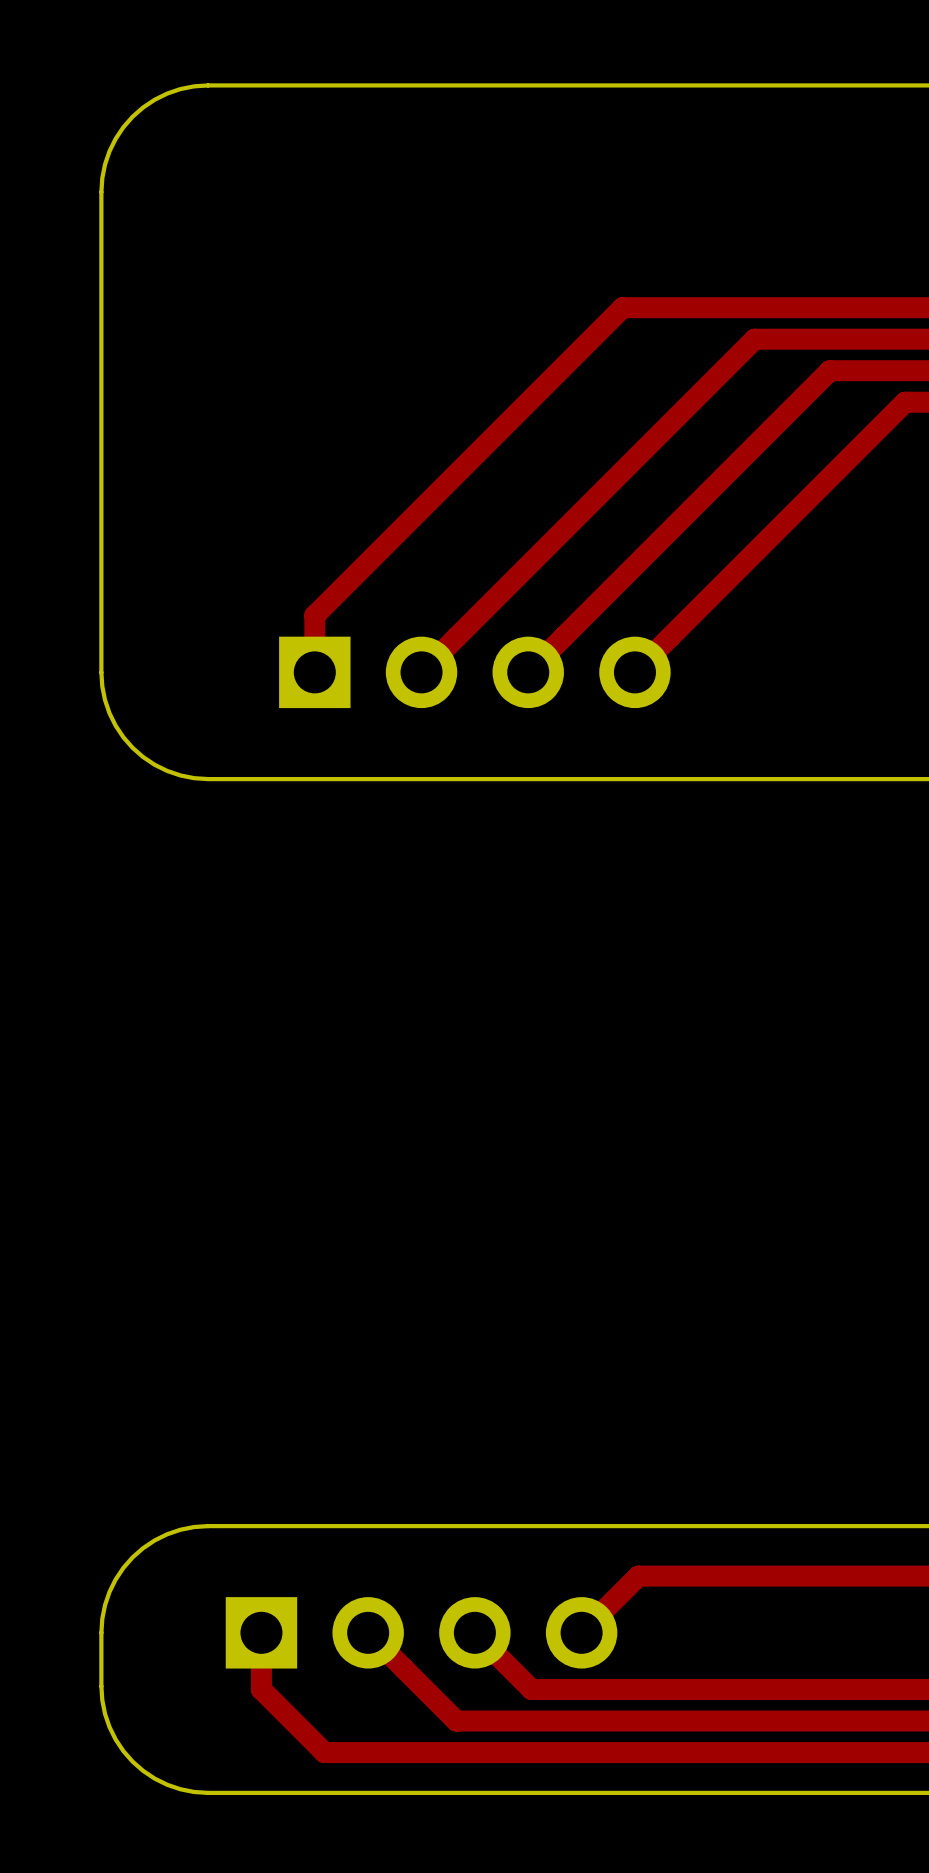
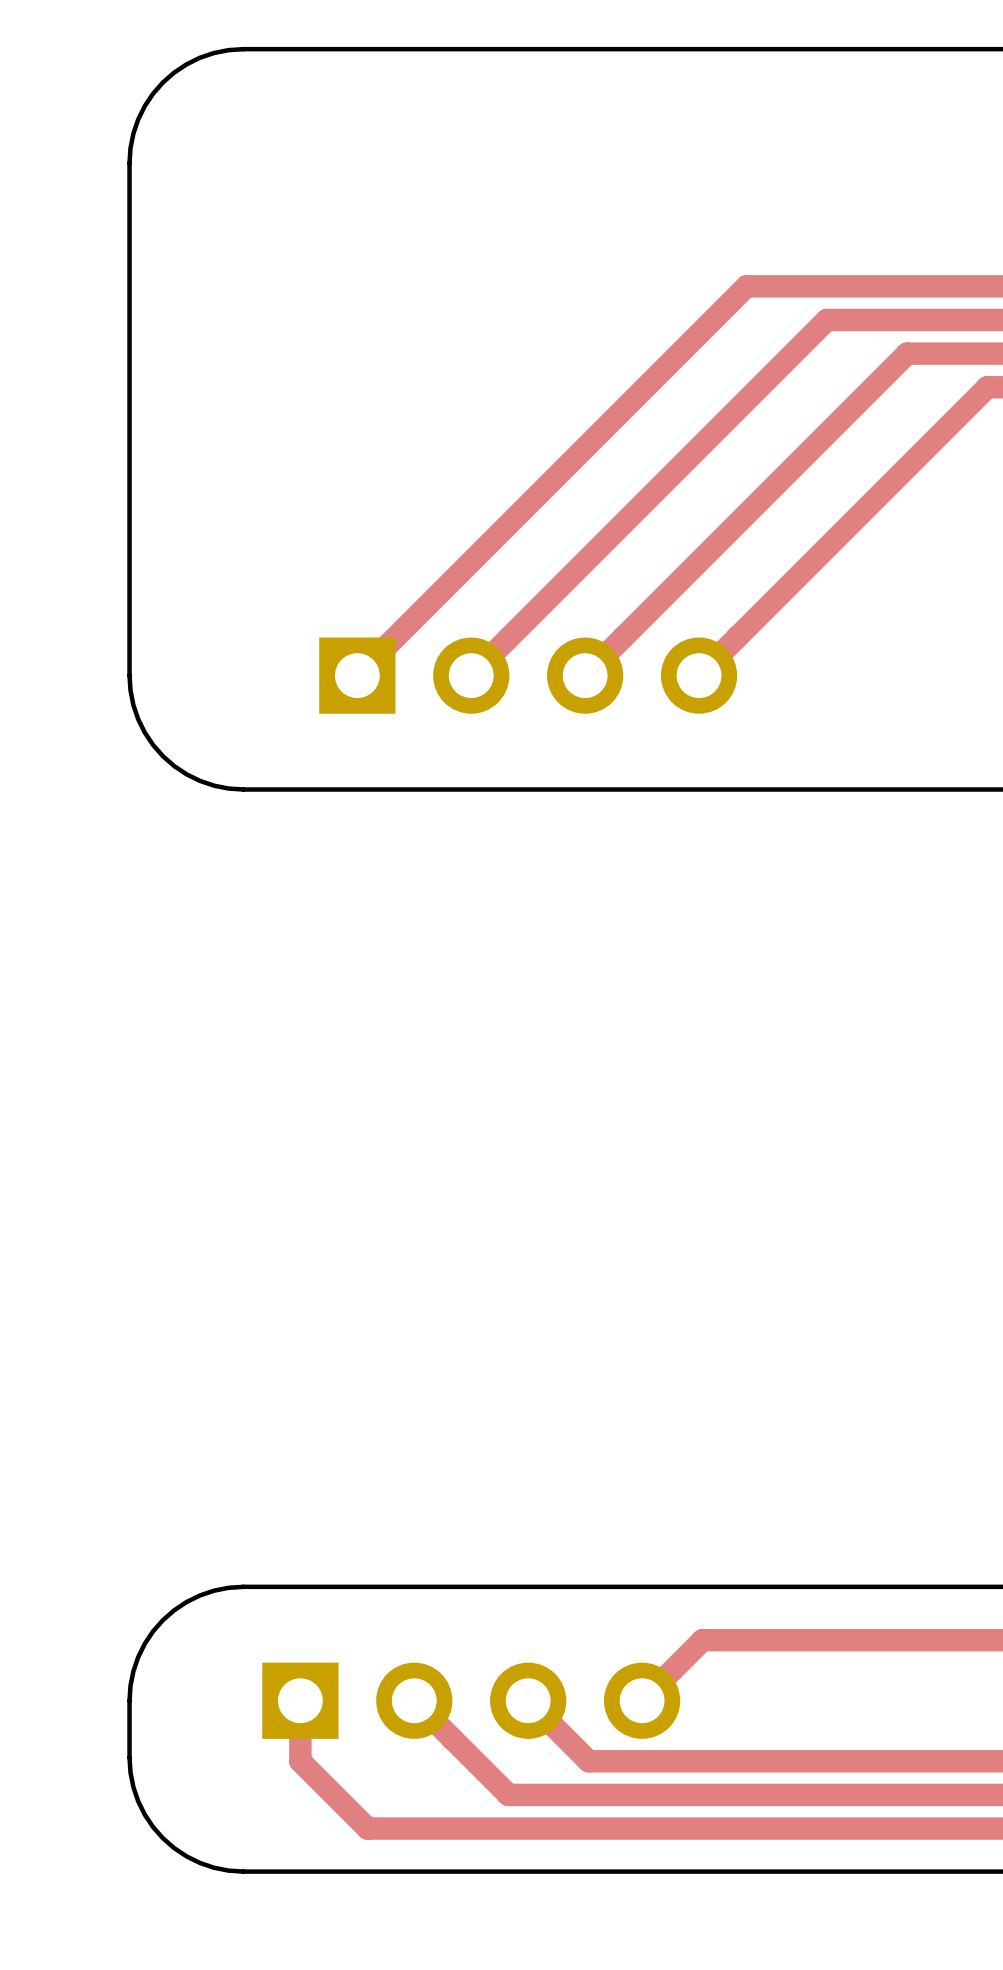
track: (679, 307) (622, 307) (314, 615) (314, 672) -> (746, 286) (357, 675)

